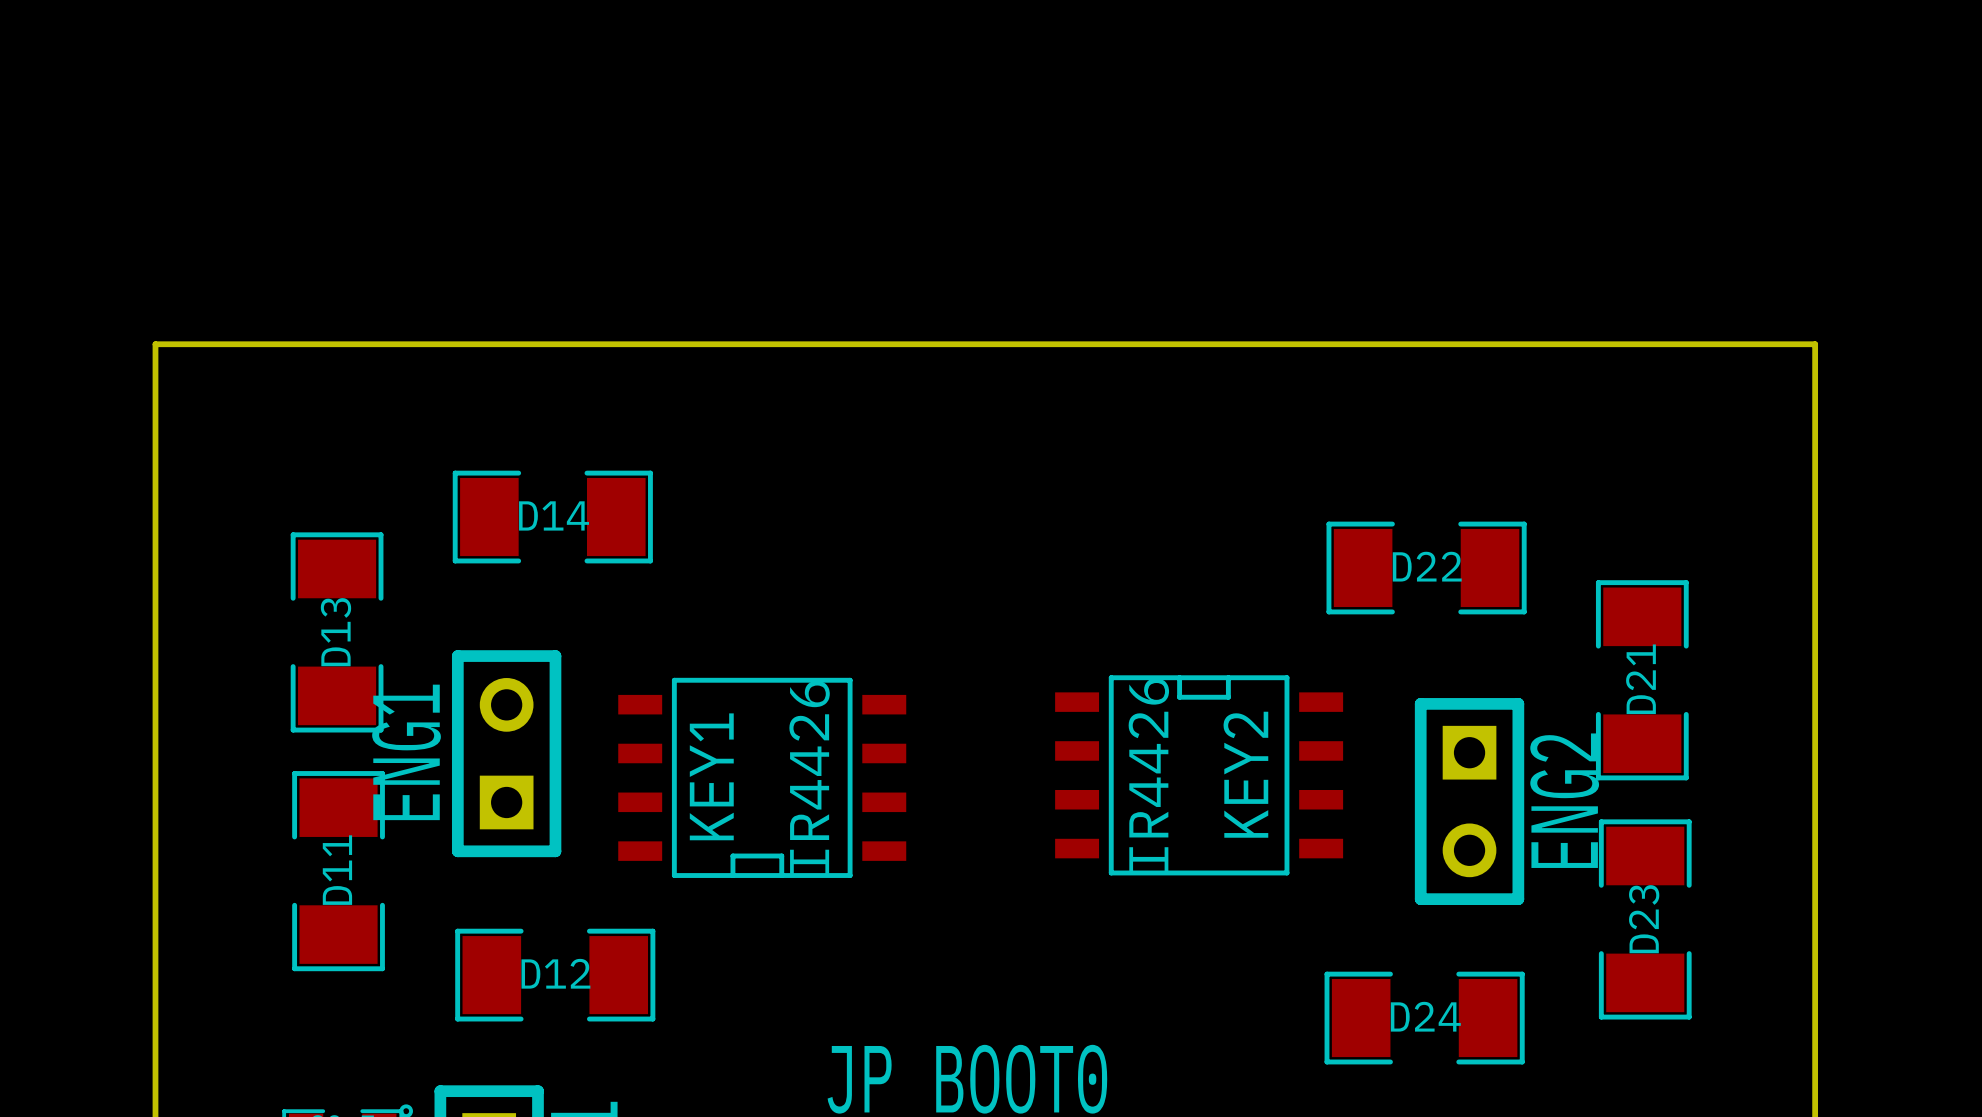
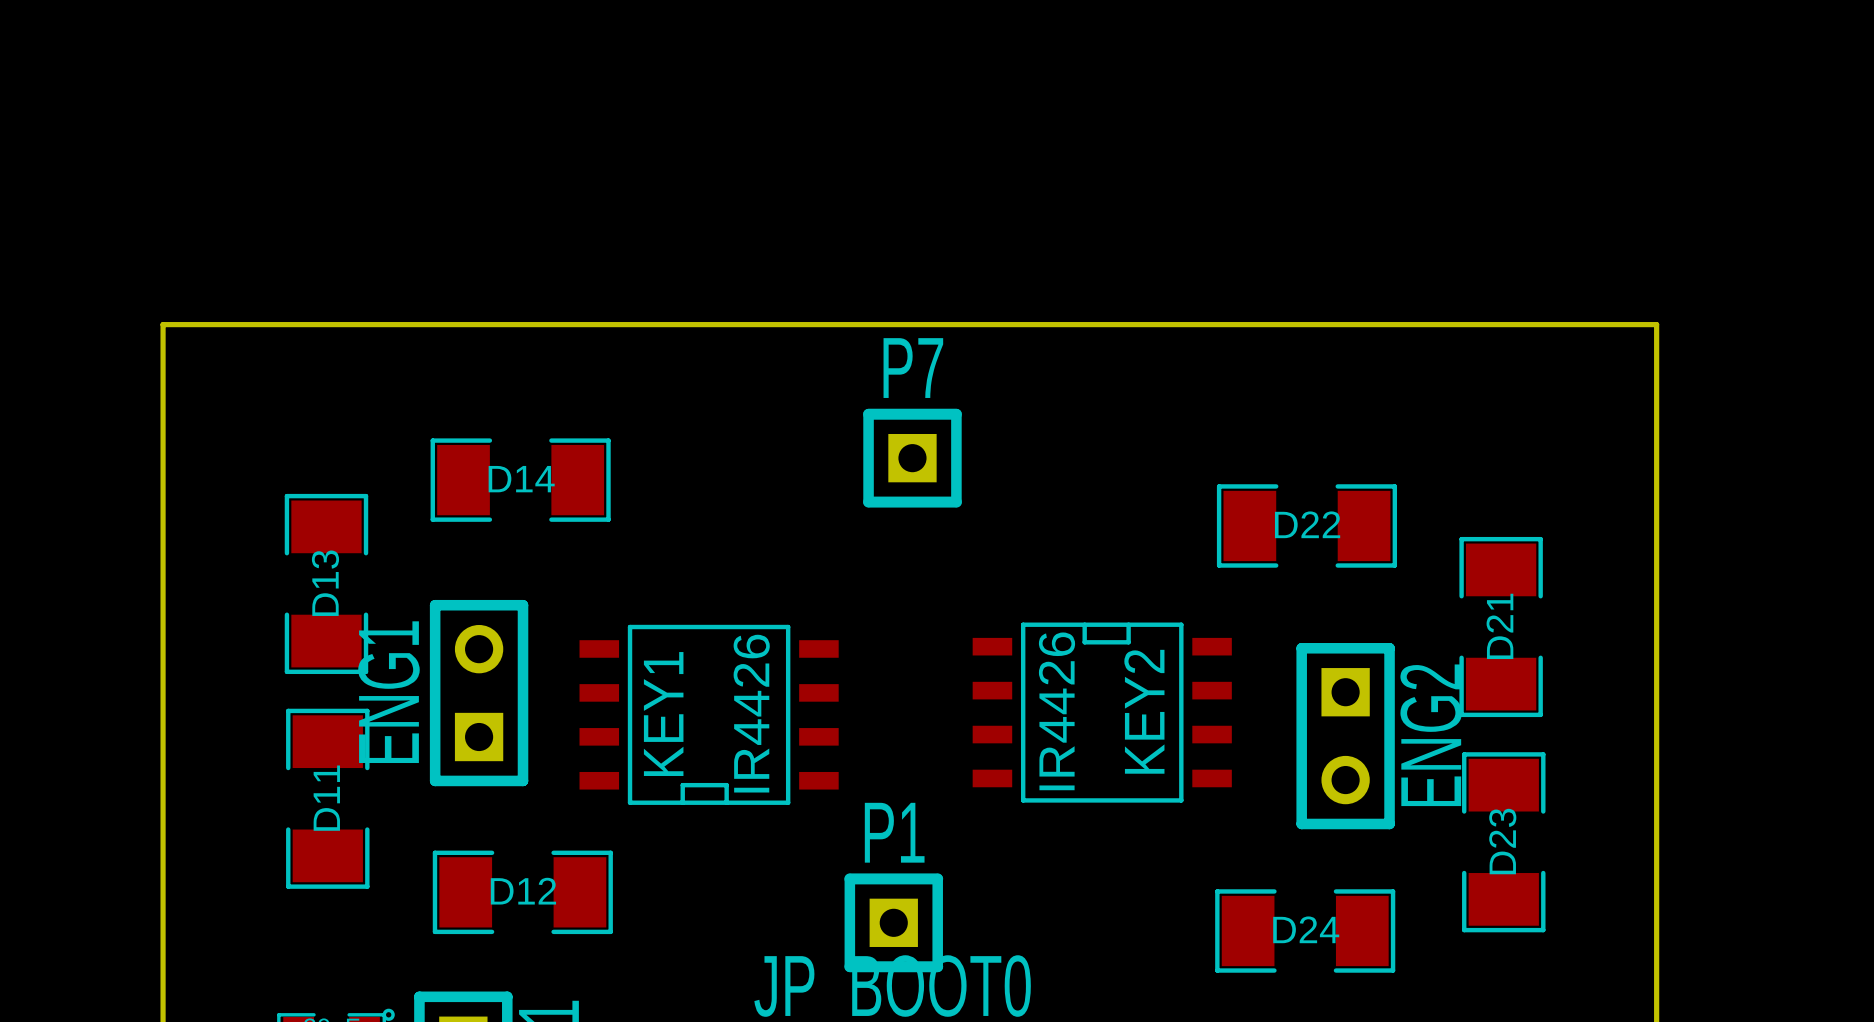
P7: none -> (912, 458)
P1: none -> (893, 922)

